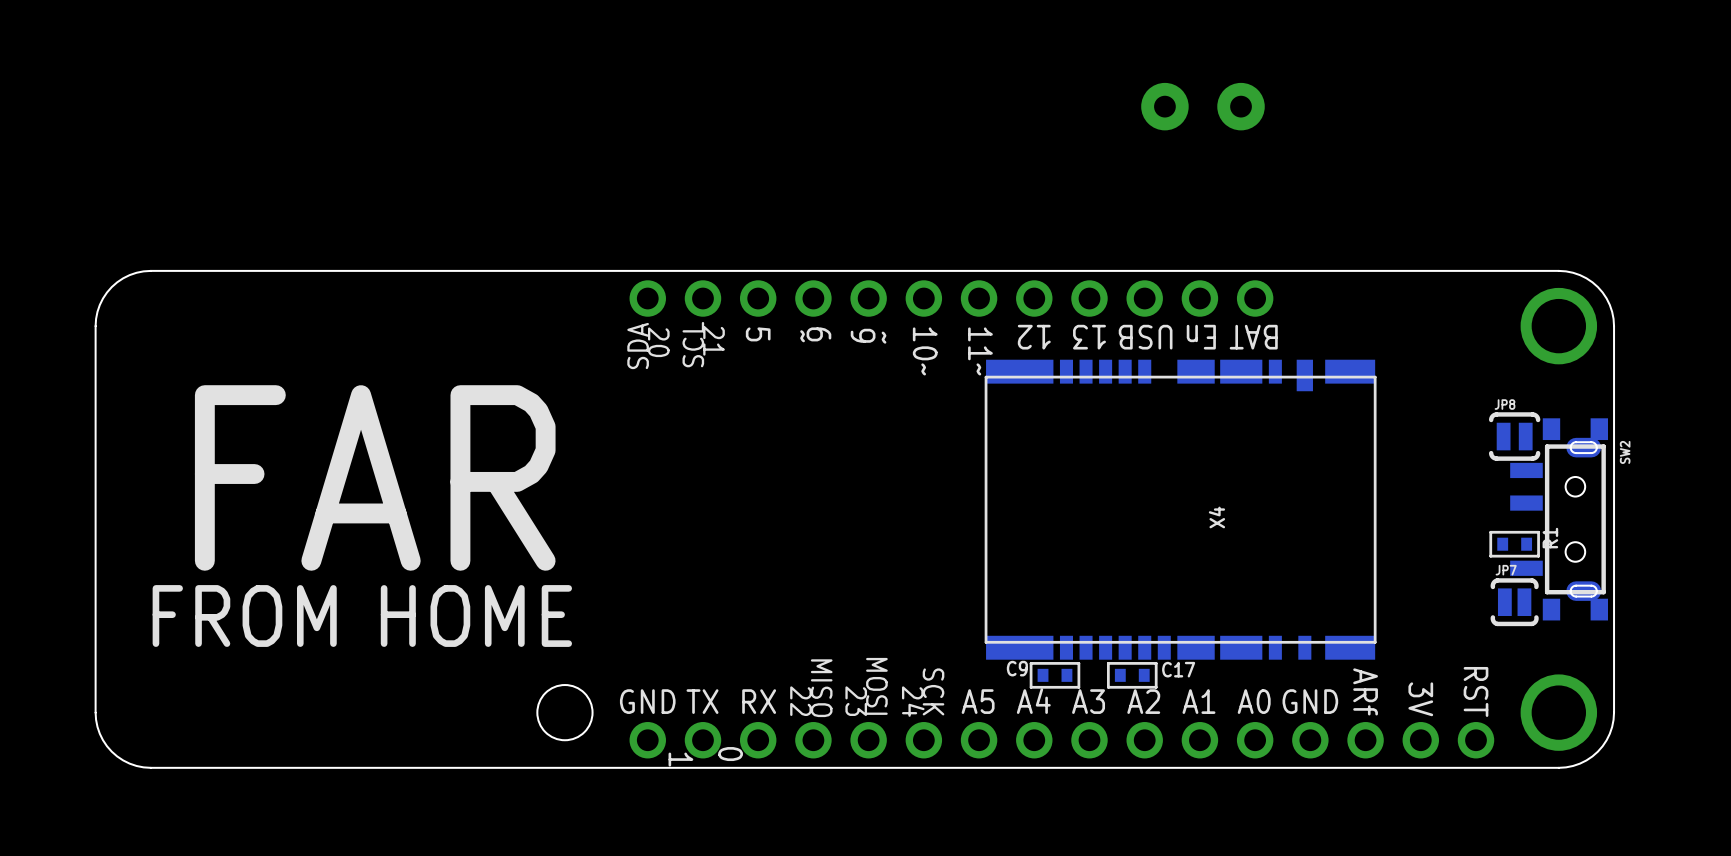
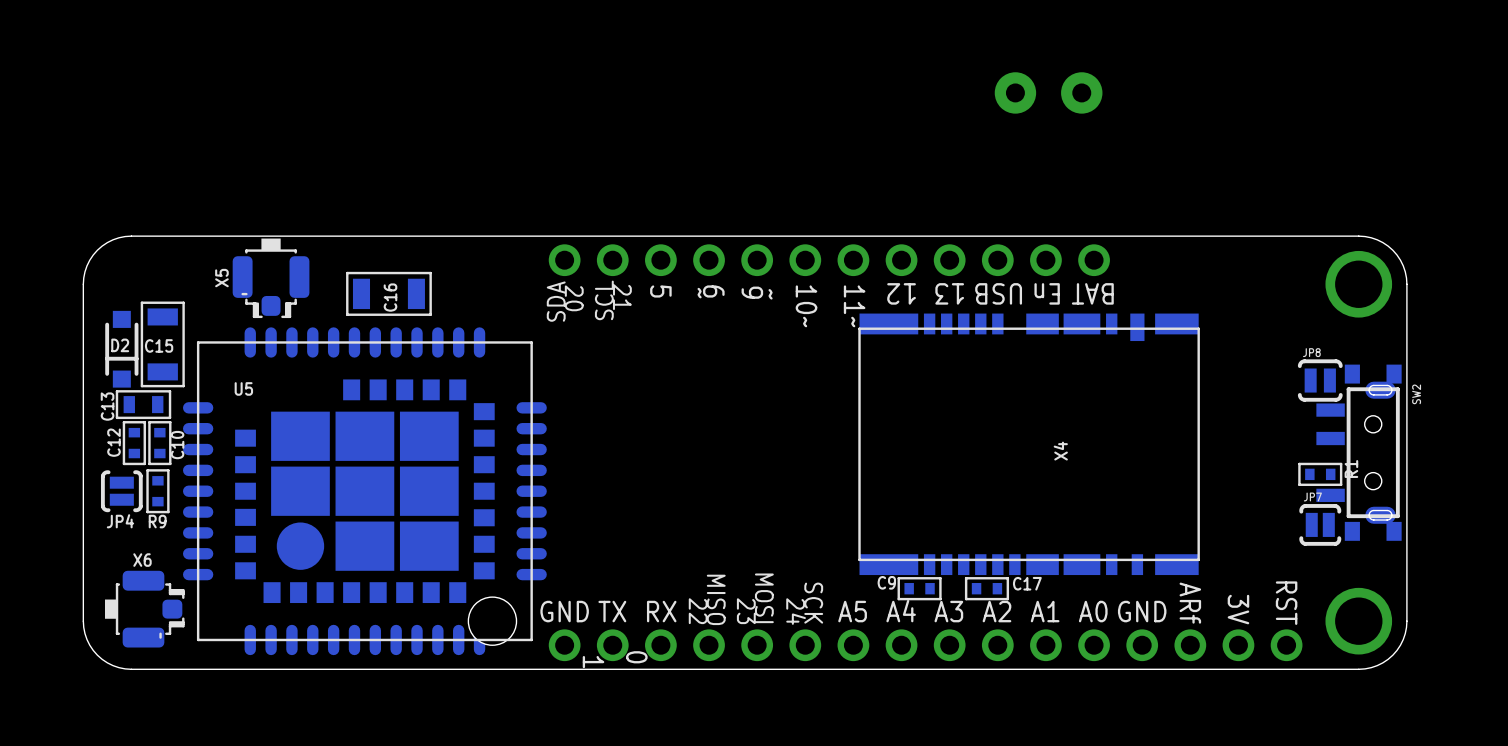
X5: none -> (271, 278)
C16: none -> (388, 293)
C15: none -> (162, 344)
D2: none -> (121, 349)
C13: none -> (143, 404)
text: FAR (375, 477) -> none
C12: none -> (134, 443)
C10: none -> (159, 443)
JP4: none -> (121, 491)
R9: none -> (157, 491)
U5: none -> (364, 491)
text: FROM (244, 616) -> none
text: HOME (476, 616) -> none
X6: none -> (144, 609)

